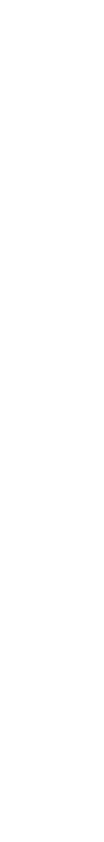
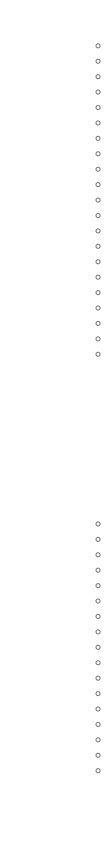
via: none -> (98, 45)
via: none -> (98, 61)
via: none -> (98, 76)
via: none -> (98, 92)
via: none -> (98, 107)
via: none -> (98, 122)
via: none -> (98, 138)
via: none -> (98, 153)
via: none -> (98, 169)
via: none -> (98, 184)
via: none -> (98, 200)
via: none -> (98, 215)
via: none -> (98, 230)
via: none -> (98, 246)
via: none -> (98, 261)
via: none -> (98, 277)
via: none -> (98, 292)
via: none -> (98, 308)
via: none -> (98, 323)
via: none -> (98, 338)
via: none -> (98, 354)
via: none -> (98, 523)
via: none -> (98, 539)
via: none -> (98, 554)
via: none -> (98, 570)
via: none -> (98, 585)
via: none -> (98, 601)
via: none -> (98, 616)
via: none -> (98, 631)
via: none -> (98, 647)
via: none -> (98, 662)
via: none -> (98, 678)
via: none -> (98, 693)
via: none -> (98, 709)
via: none -> (98, 724)
via: none -> (98, 739)
via: none -> (98, 755)
via: none -> (98, 770)

